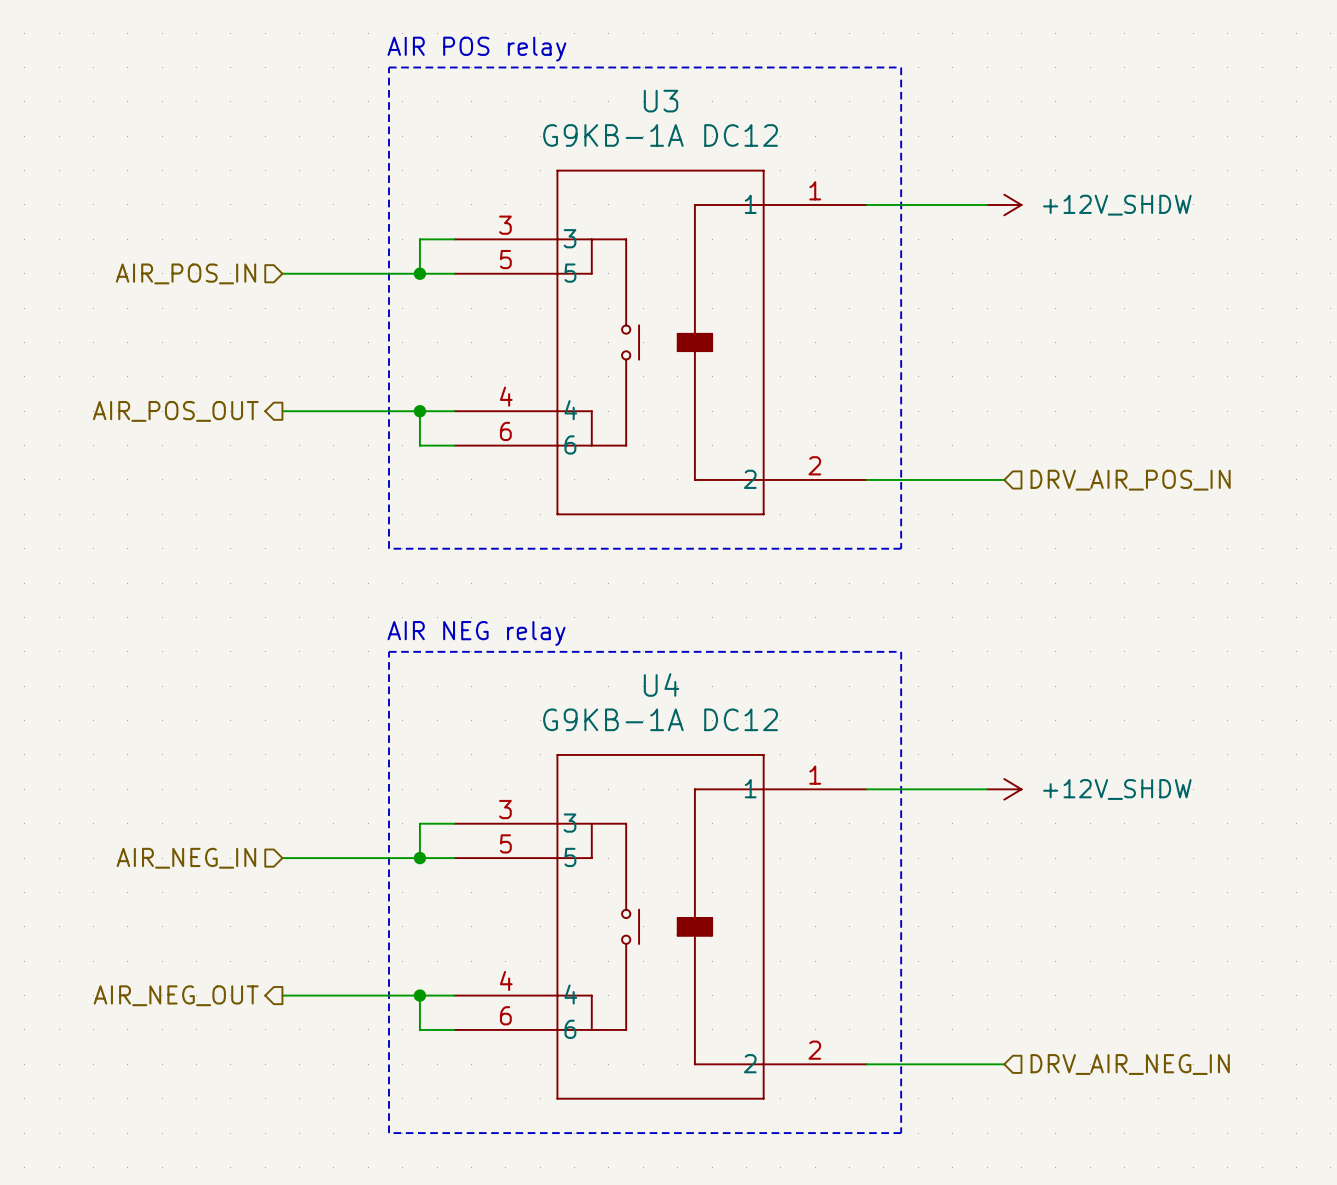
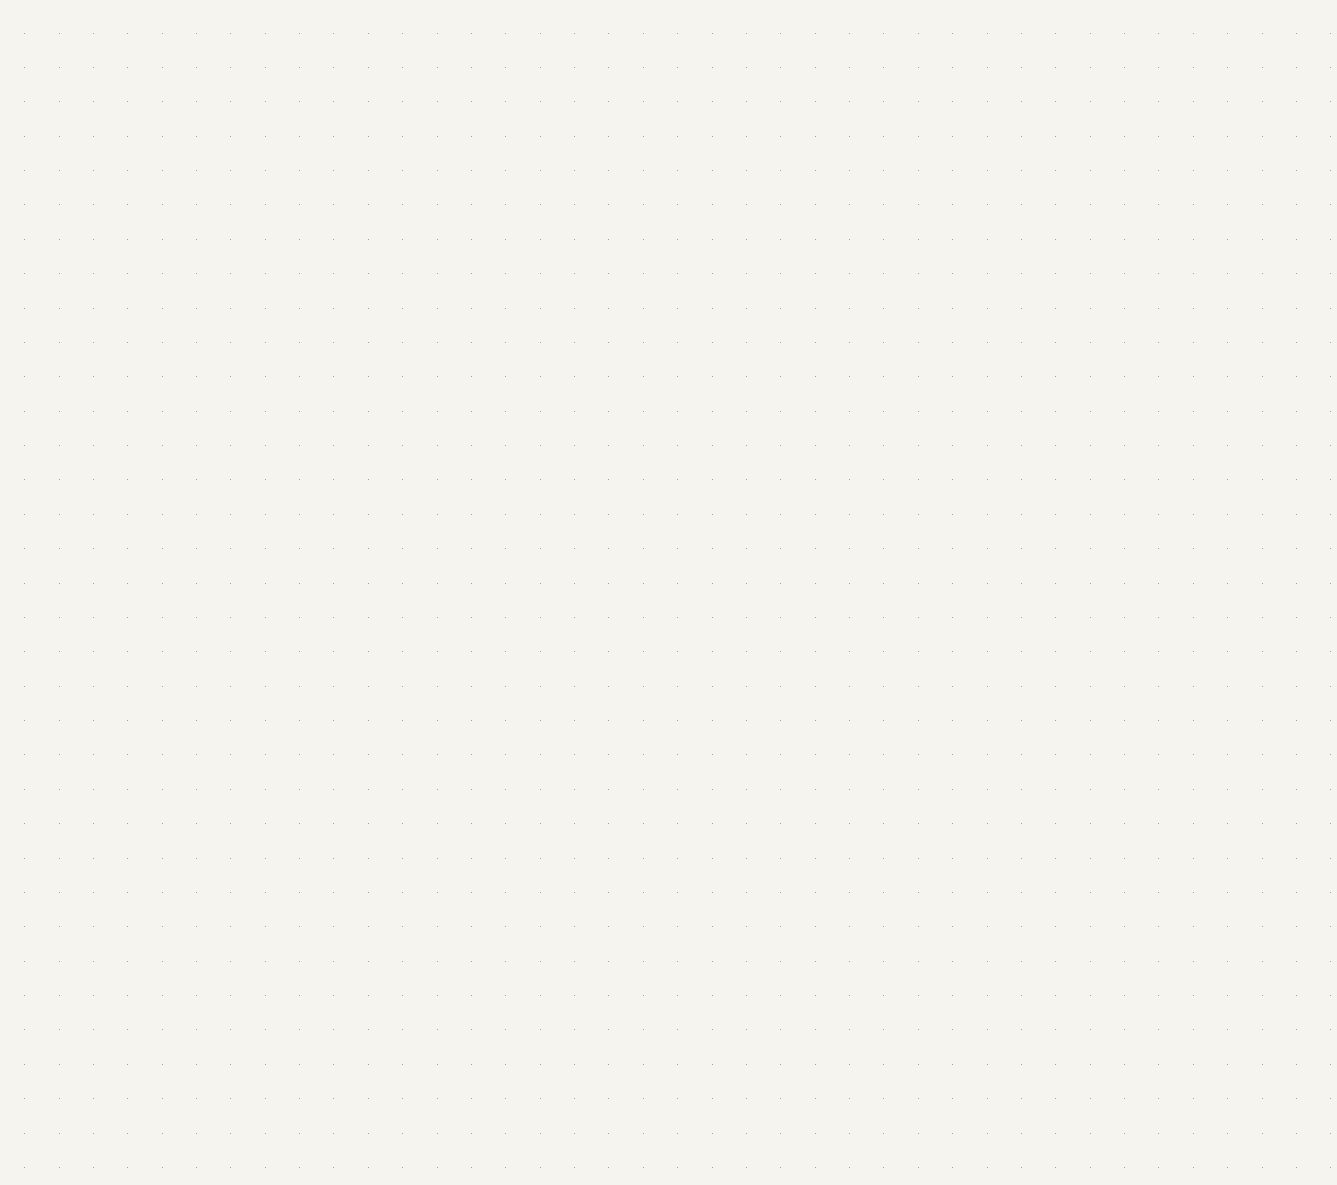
text: AIR POS relay (476, 49) -> none
line: (388, 67) (388, 548) (901, 548) (901, 67) (388, 67) -> none
wire: (866, 204) (987, 204) -> none
power symbol: +12V_SHDW (1004, 204) -> none
wire: (454, 239) (419, 239) (419, 273) -> none
hierarchical label: AIR_POS_IN (186, 273) -> none
wire: (282, 273) (454, 273) -> none
junction: (419, 273) -> none
U3: G9KB-1A DC12 (660, 342) -> none
hierarchical label: AIR_POS_OUT (175, 411) -> none
wire: (282, 411) (454, 411) -> none
wire: (419, 411) (419, 445) (454, 445) -> none
junction: (419, 411) -> none
wire: (866, 479) (1004, 479) -> none
hierarchical label: DRV_AIR_POS_IN (1130, 480) -> none
text: AIR NEG relay (476, 633) -> none
line: (388, 651) (901, 651) (901, 1133) (388, 1133) (388, 651) -> none
wire: (866, 789) (987, 789) -> none
power symbol: +12V_SHDW (1004, 789) -> none
wire: (454, 823) (419, 823) (419, 858) -> none
hierarchical label: AIR_NEG_IN (186, 858) -> none
wire: (282, 858) (454, 858) -> none
junction: (419, 858) -> none
U4: G9KB-1A DC12 (660, 926) -> none
hierarchical label: AIR_NEG_OUT (176, 995) -> none
wire: (282, 995) (454, 995) -> none
wire: (419, 995) (419, 1029) (454, 1029) -> none
junction: (419, 995) -> none
wire: (866, 1064) (1004, 1064) -> none
hierarchical label: DRV_AIR_NEG_IN (1130, 1064) -> none

